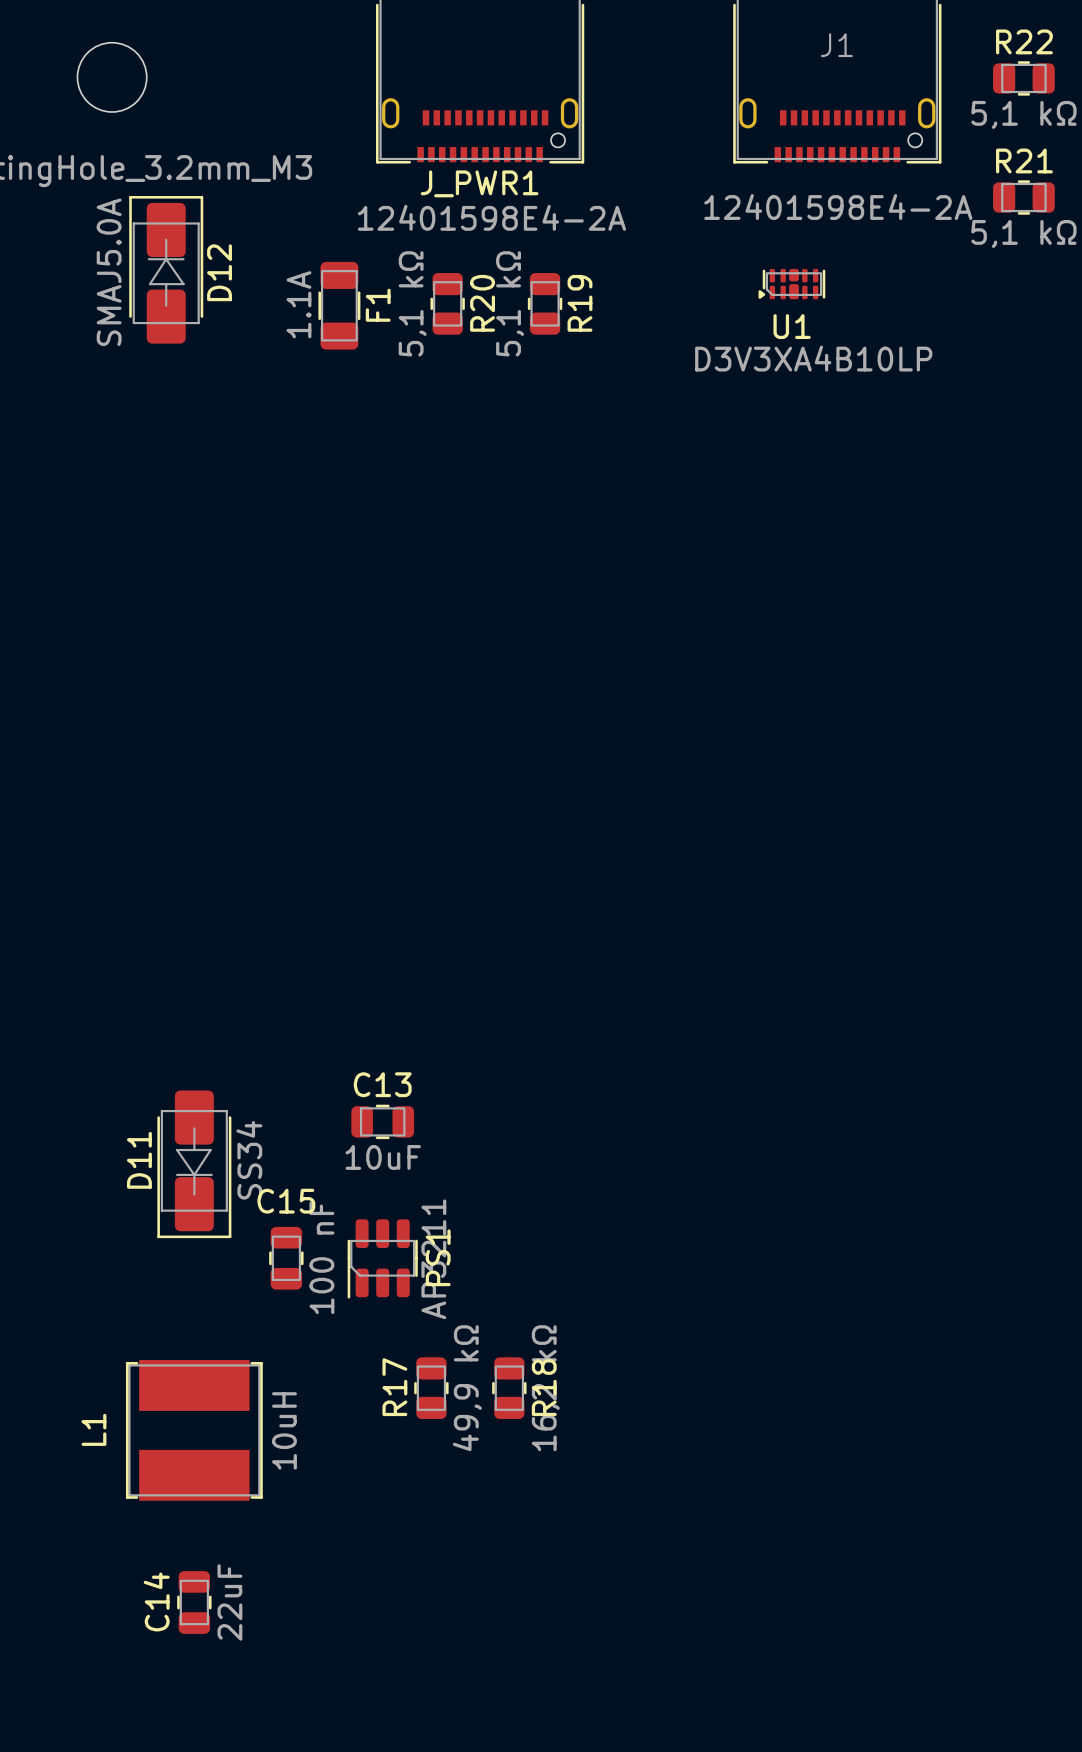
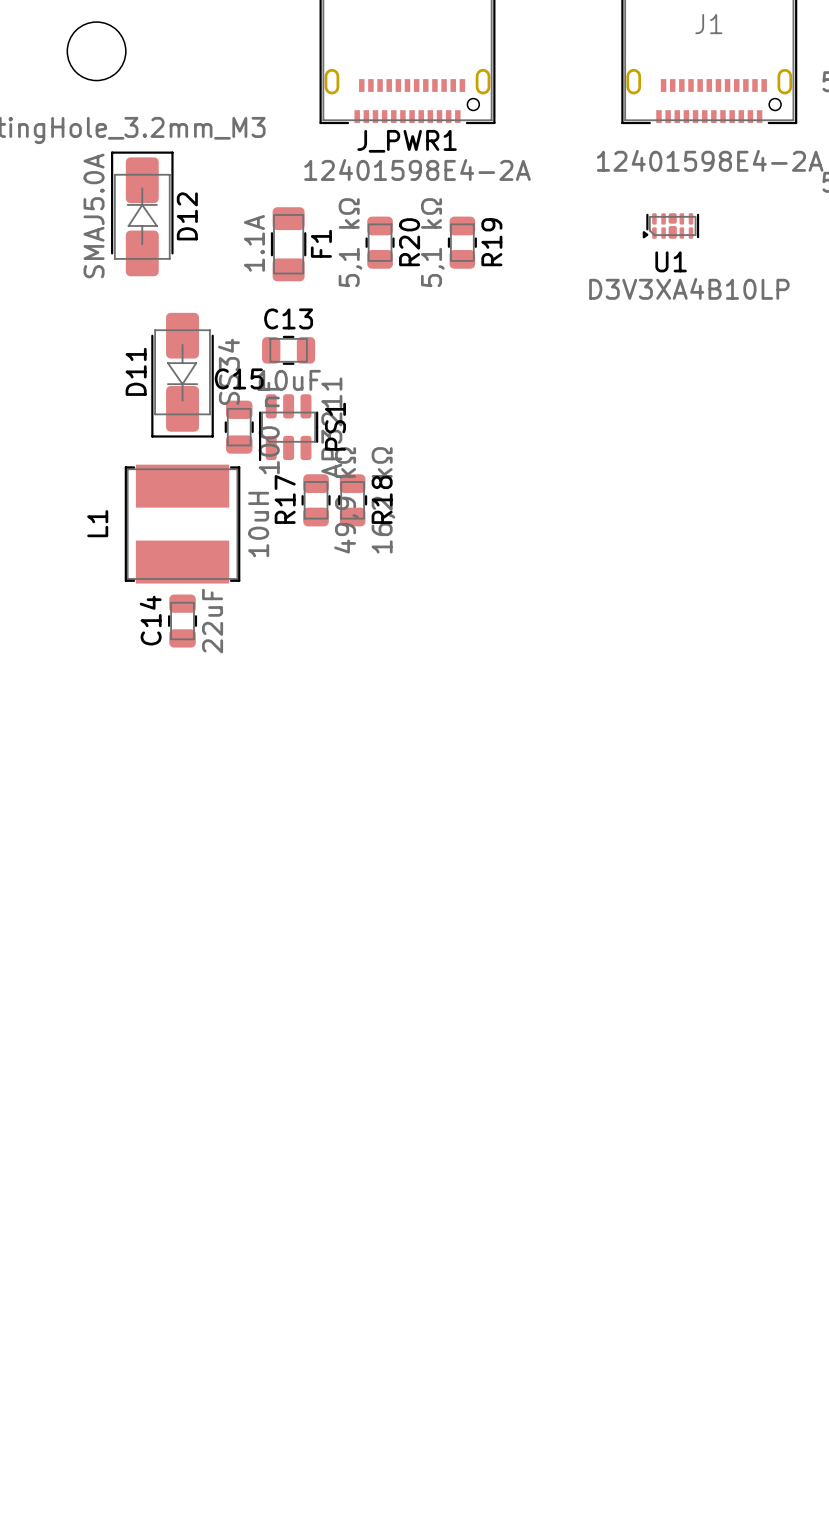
C13 position: (382, 1121) -> (288, 350)
D11 position: (194, 1164) -> (182, 375)
C15 position: (286, 1258) -> (239, 427)
PS1 position: (382, 1258) -> (288, 427)
R17 position: (431, 1388) -> (316, 500)
R18 position: (509, 1388) -> (352, 500)
L1 position: (194, 1430) -> (182, 524)
C14 position: (194, 1602) -> (182, 621)

